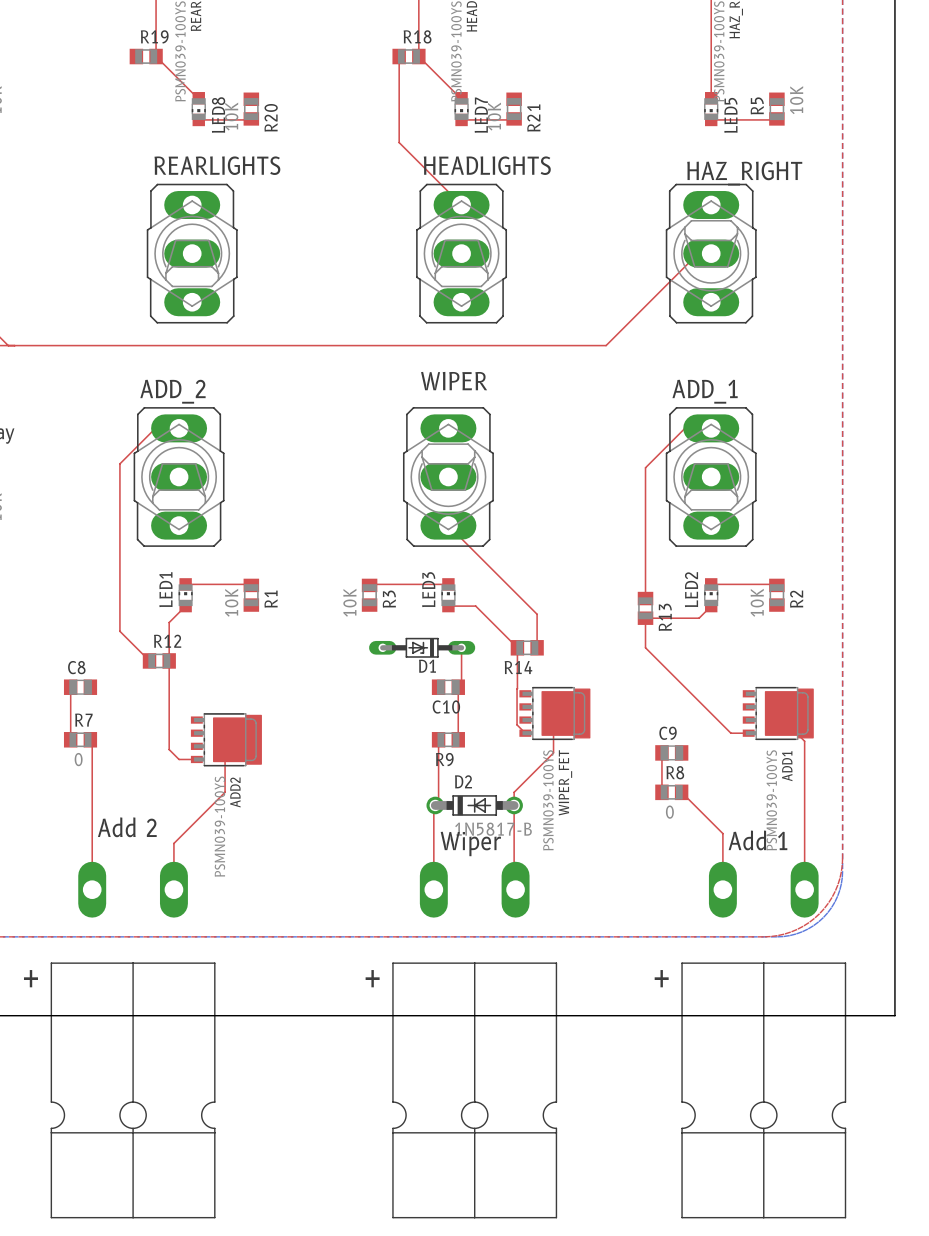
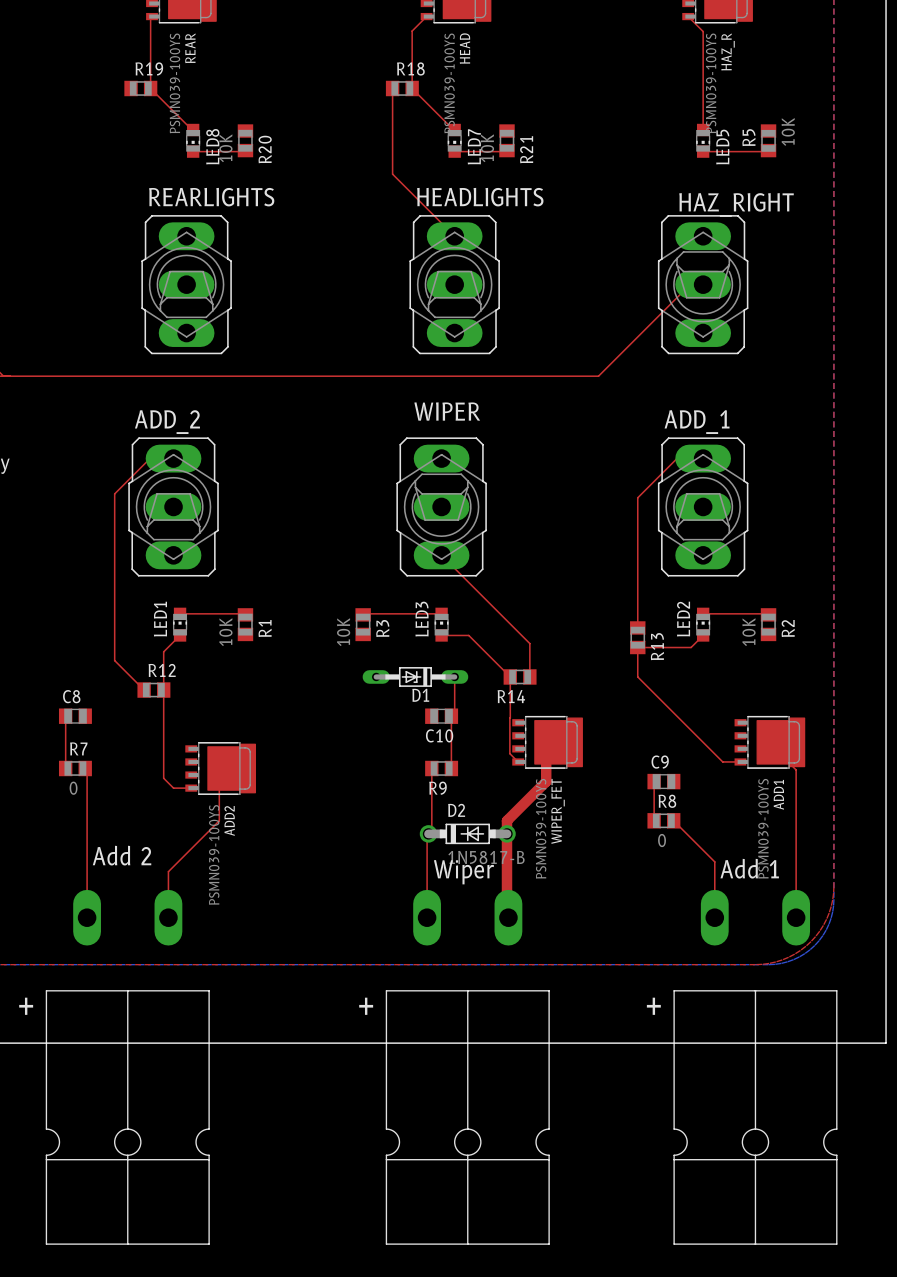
top track width: thin (553, 713) (553, 752) (514, 792) (514, 888) -> thick (546, 742) (546, 781) (506, 820) (506, 916)

